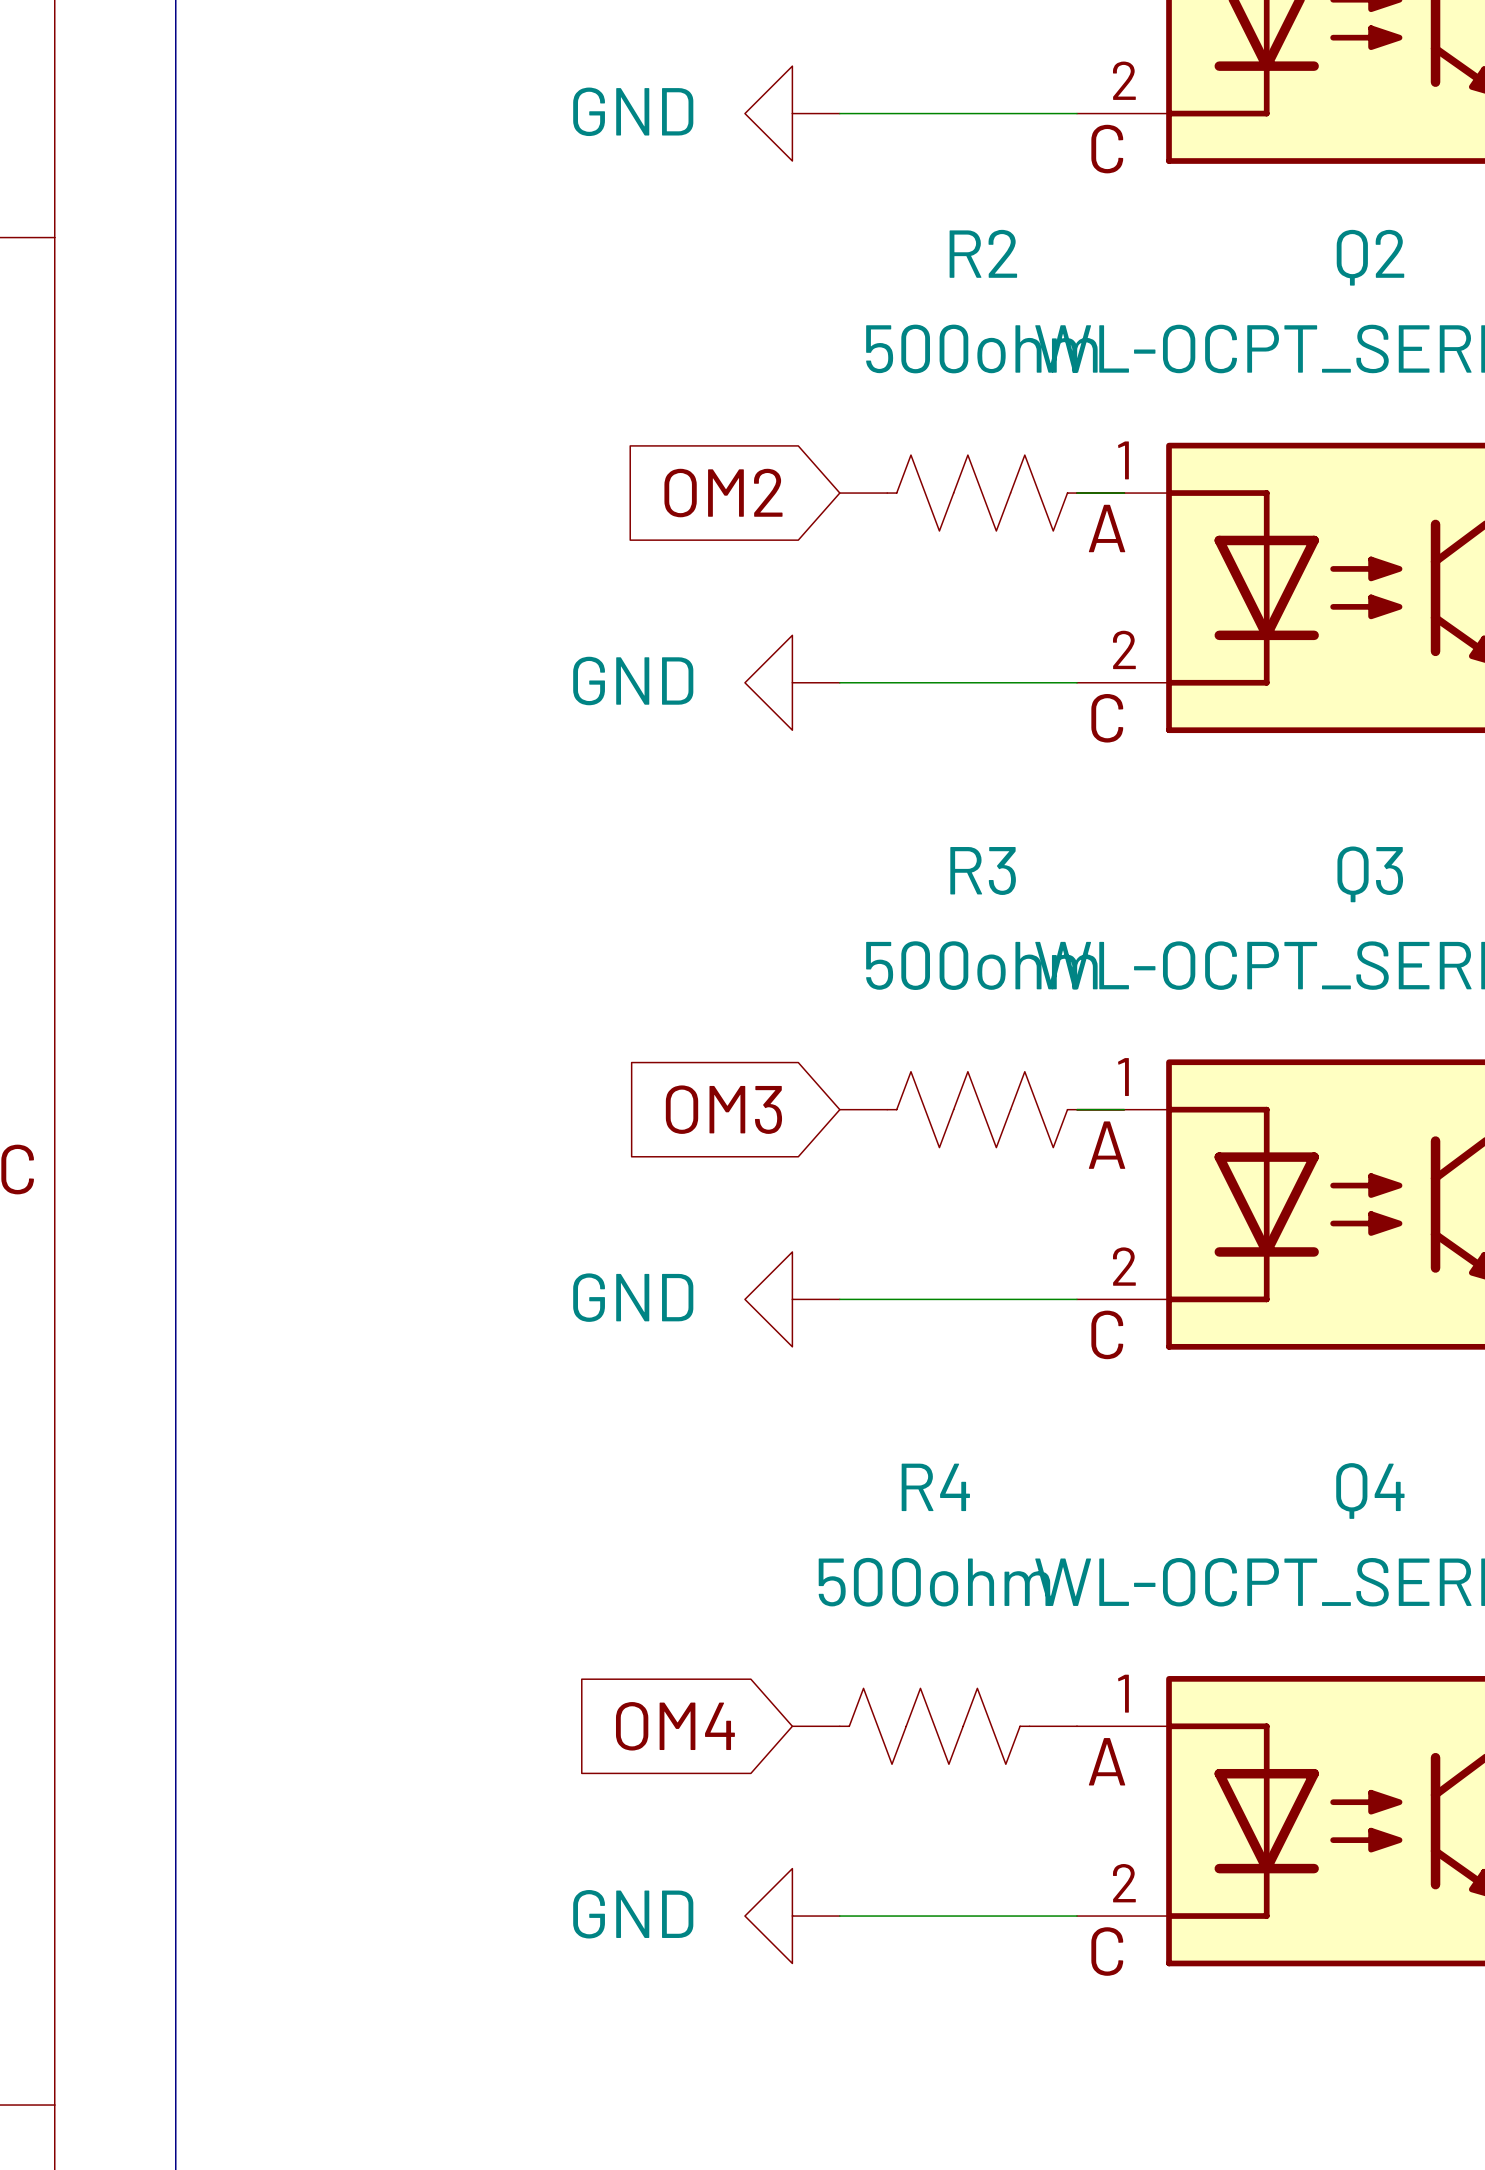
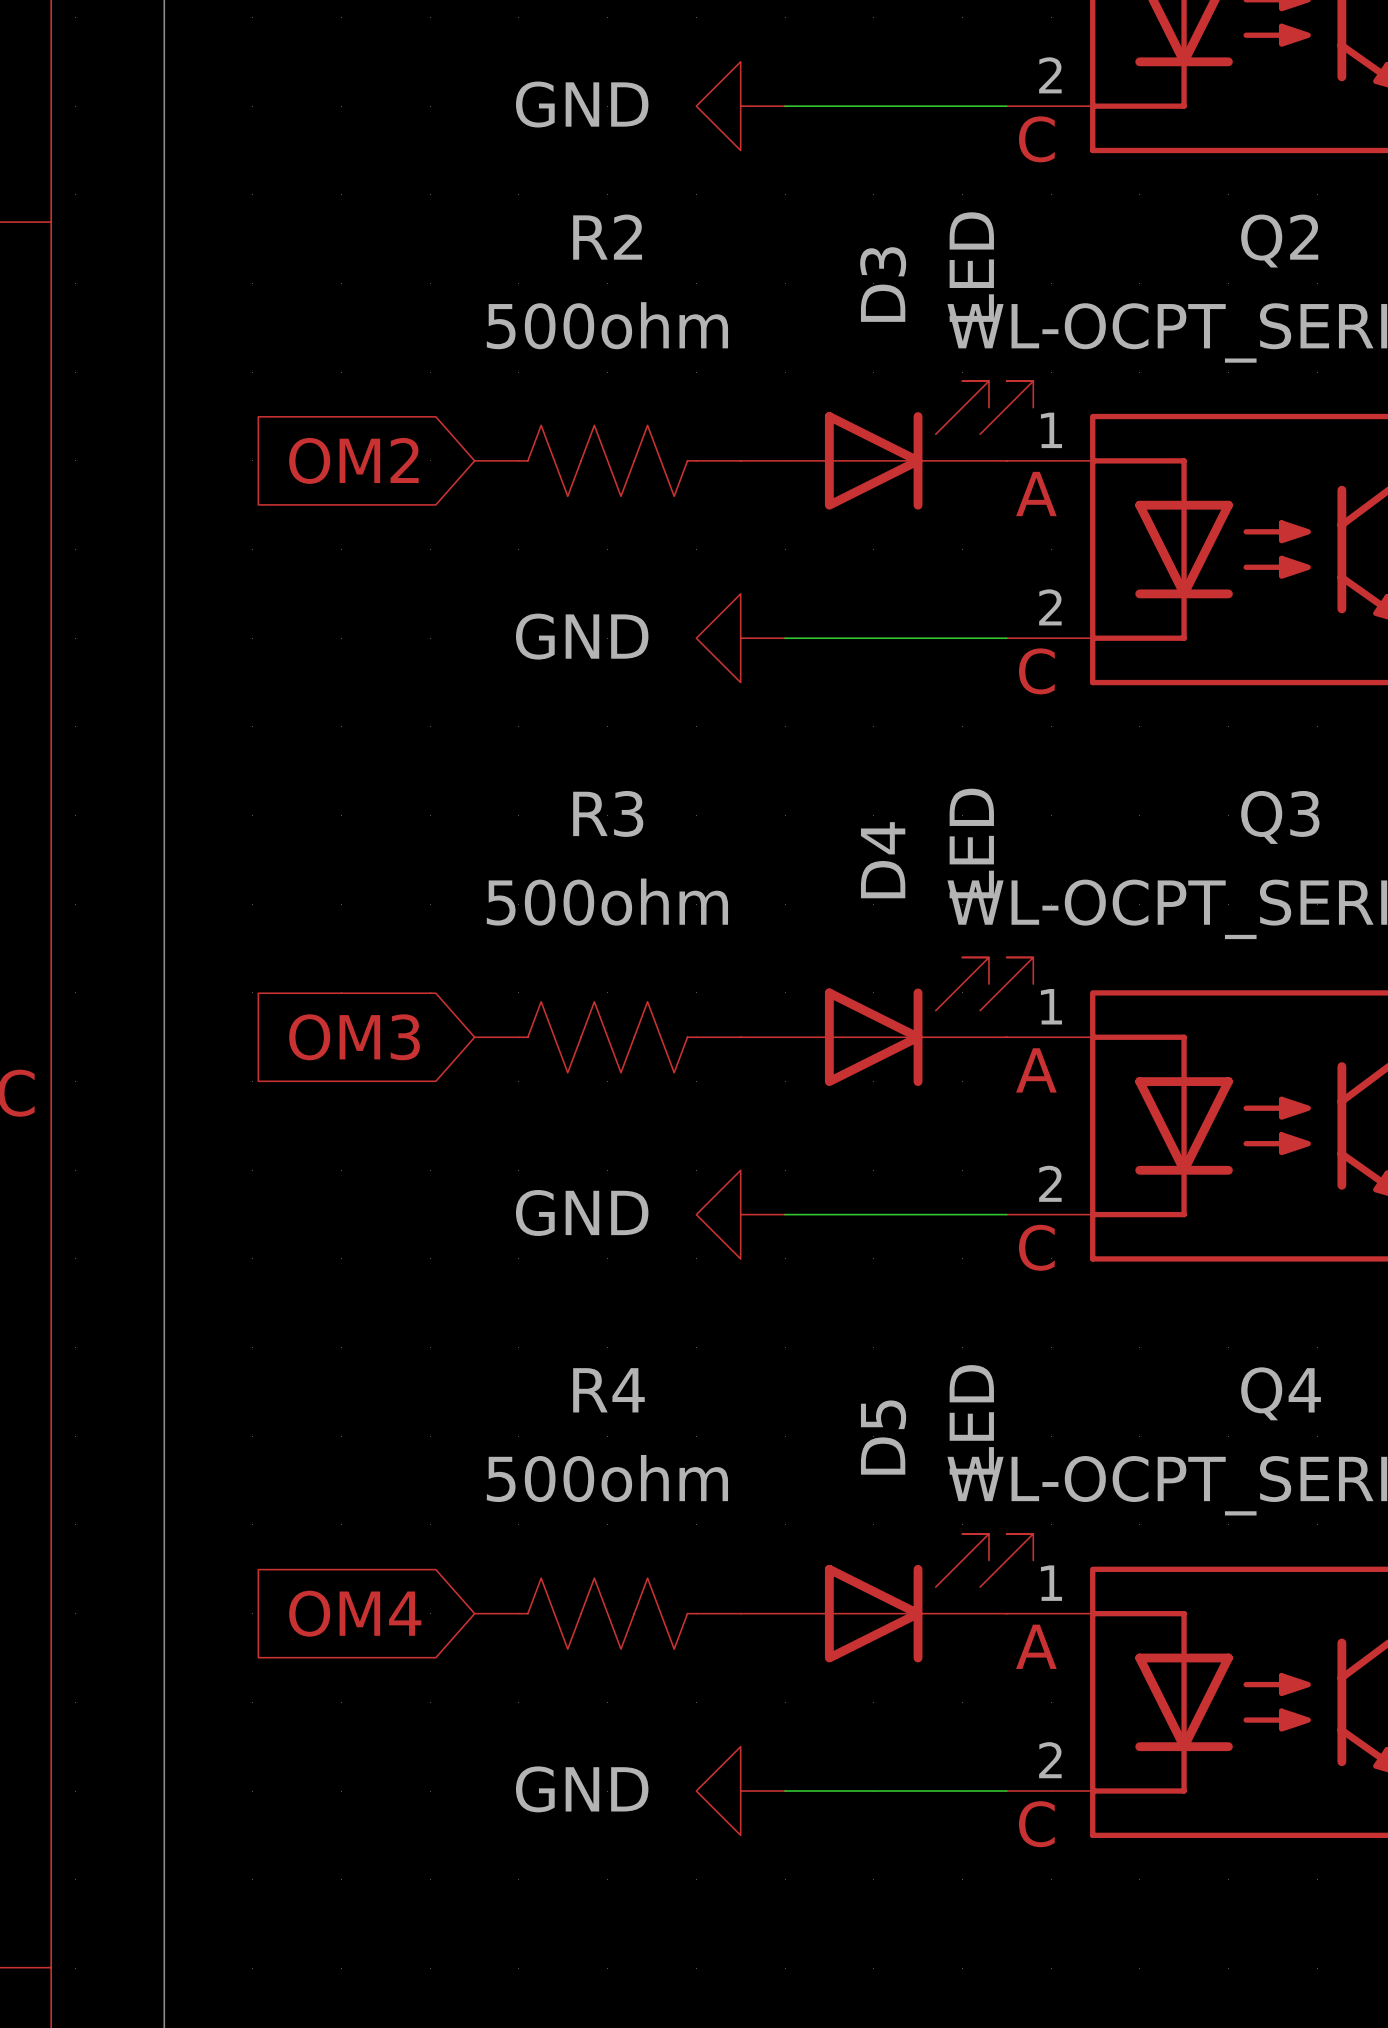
D3: none -> LED (887, 445)
global label position: OM2 (723, 493) -> OM2 (353, 460)
R2 position: (982, 493) -> (607, 460)
D4: none -> LED (887, 1021)
global label position: OM3 (723, 1109) -> OM3 (354, 1037)
R3 position: (982, 1109) -> (607, 1037)
D5: none -> LED (887, 1598)
global label position: OM4 (675, 1726) -> OM4 (355, 1613)
R4 position: (934, 1726) -> (607, 1613)

